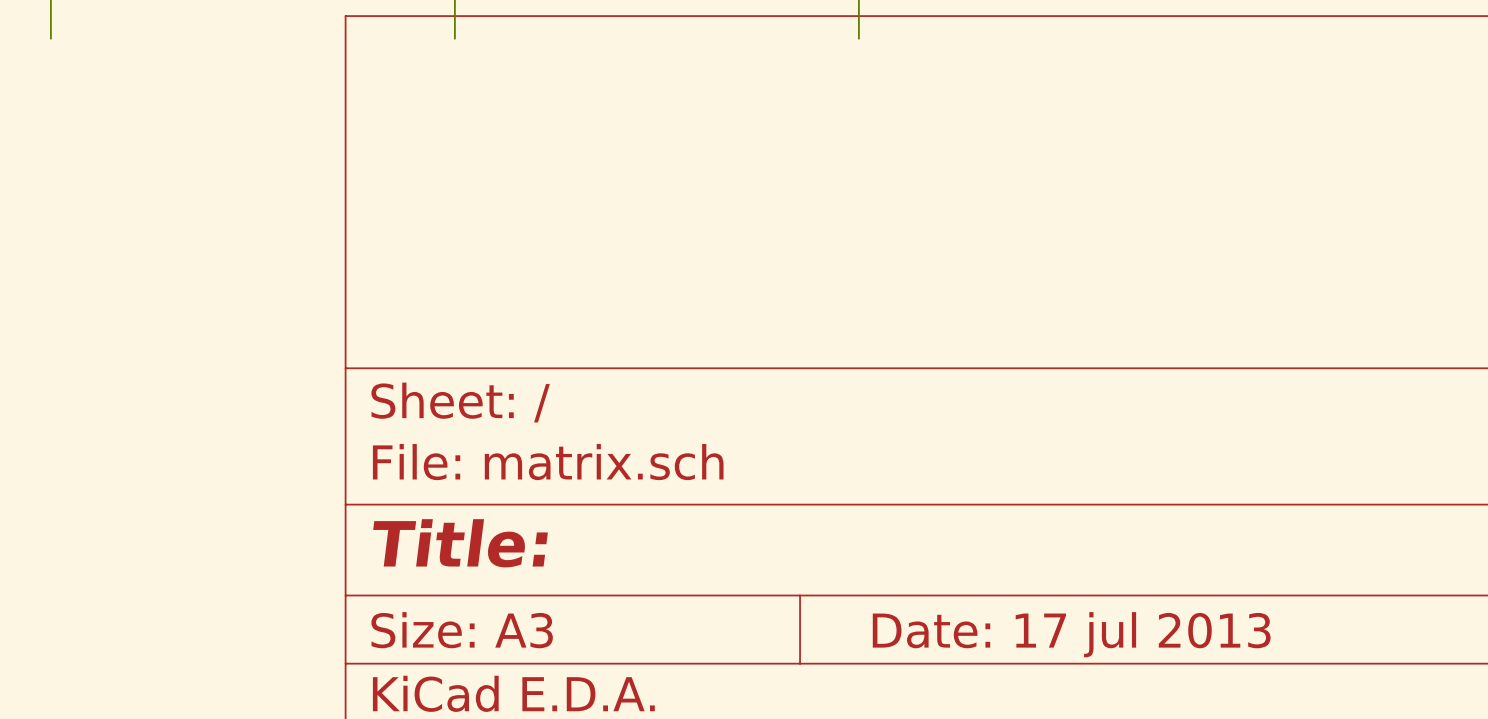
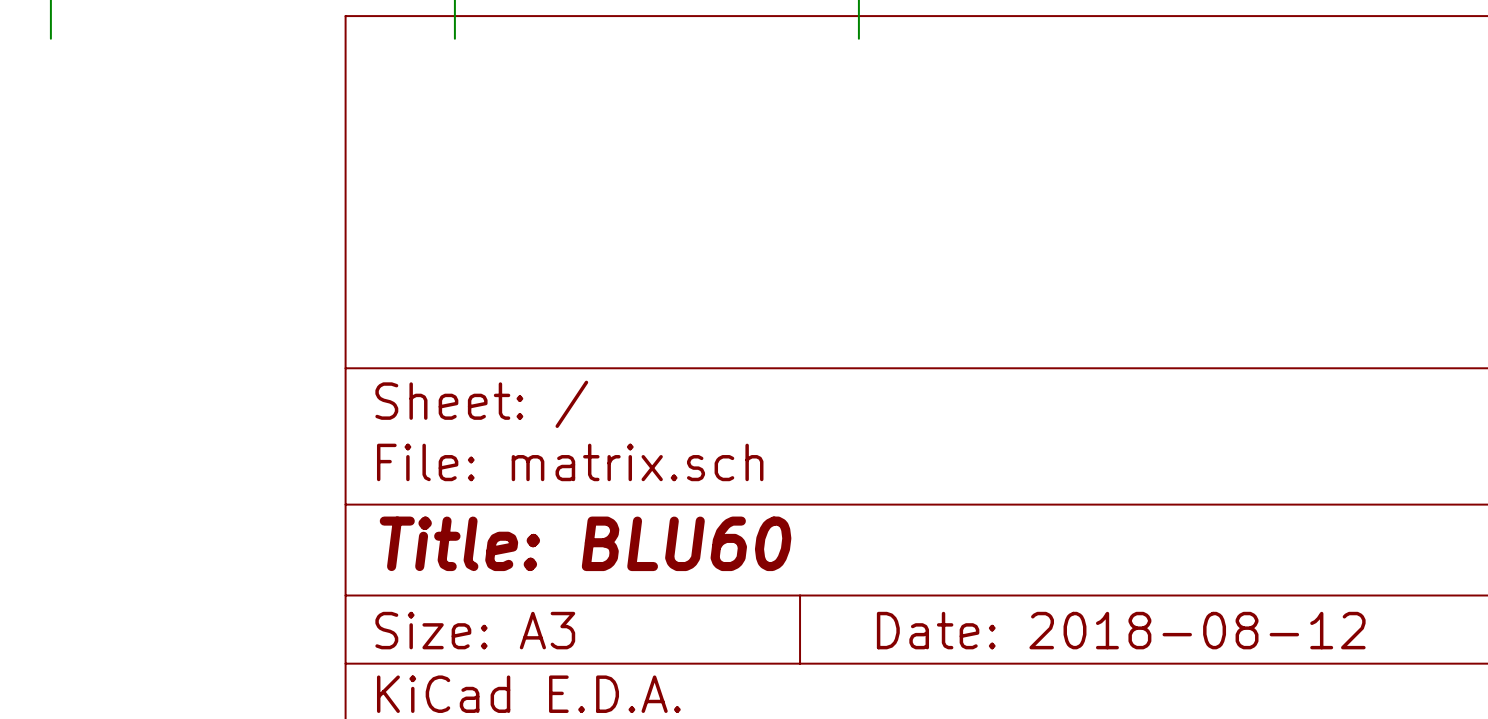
title block: Title: (460, 543) -> Title: BLU60 (585, 543)
title block: Date: 17 jul 2013 (1071, 634) -> Date: 2018-08-12 (1121, 630)

